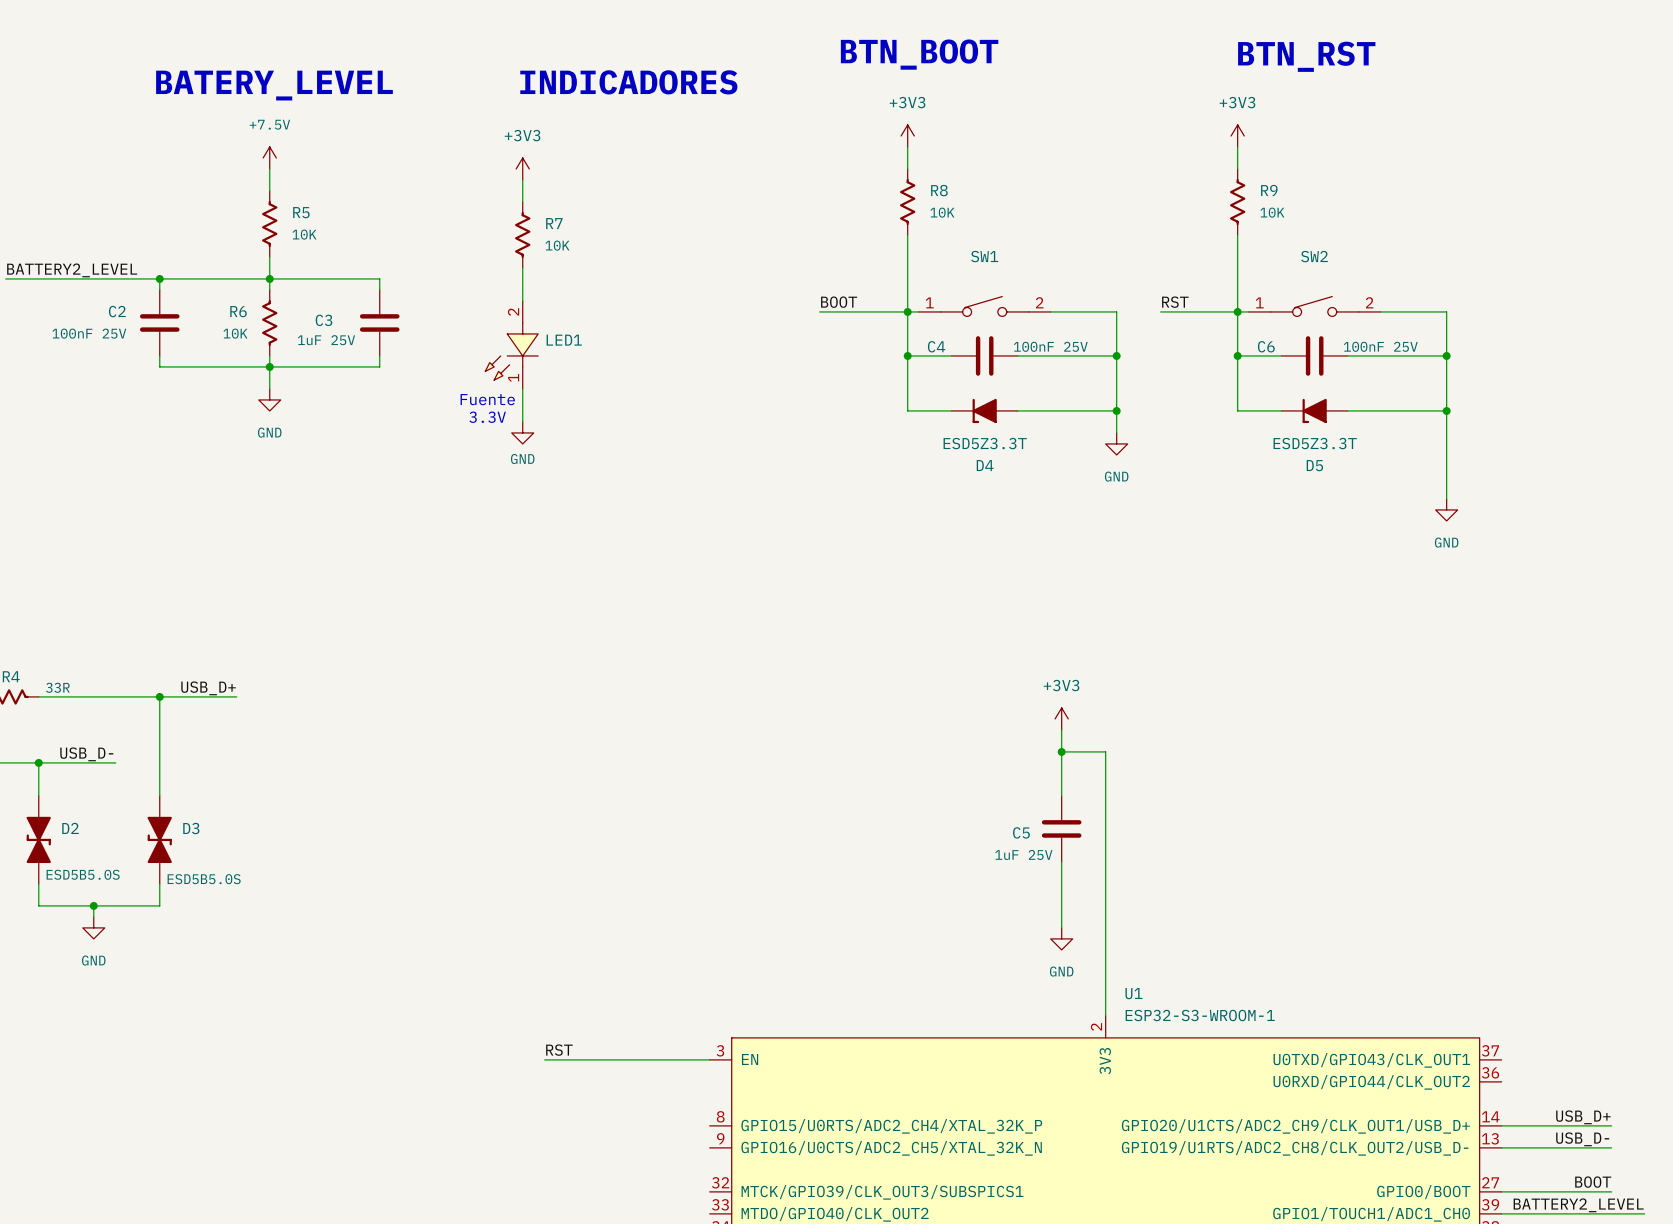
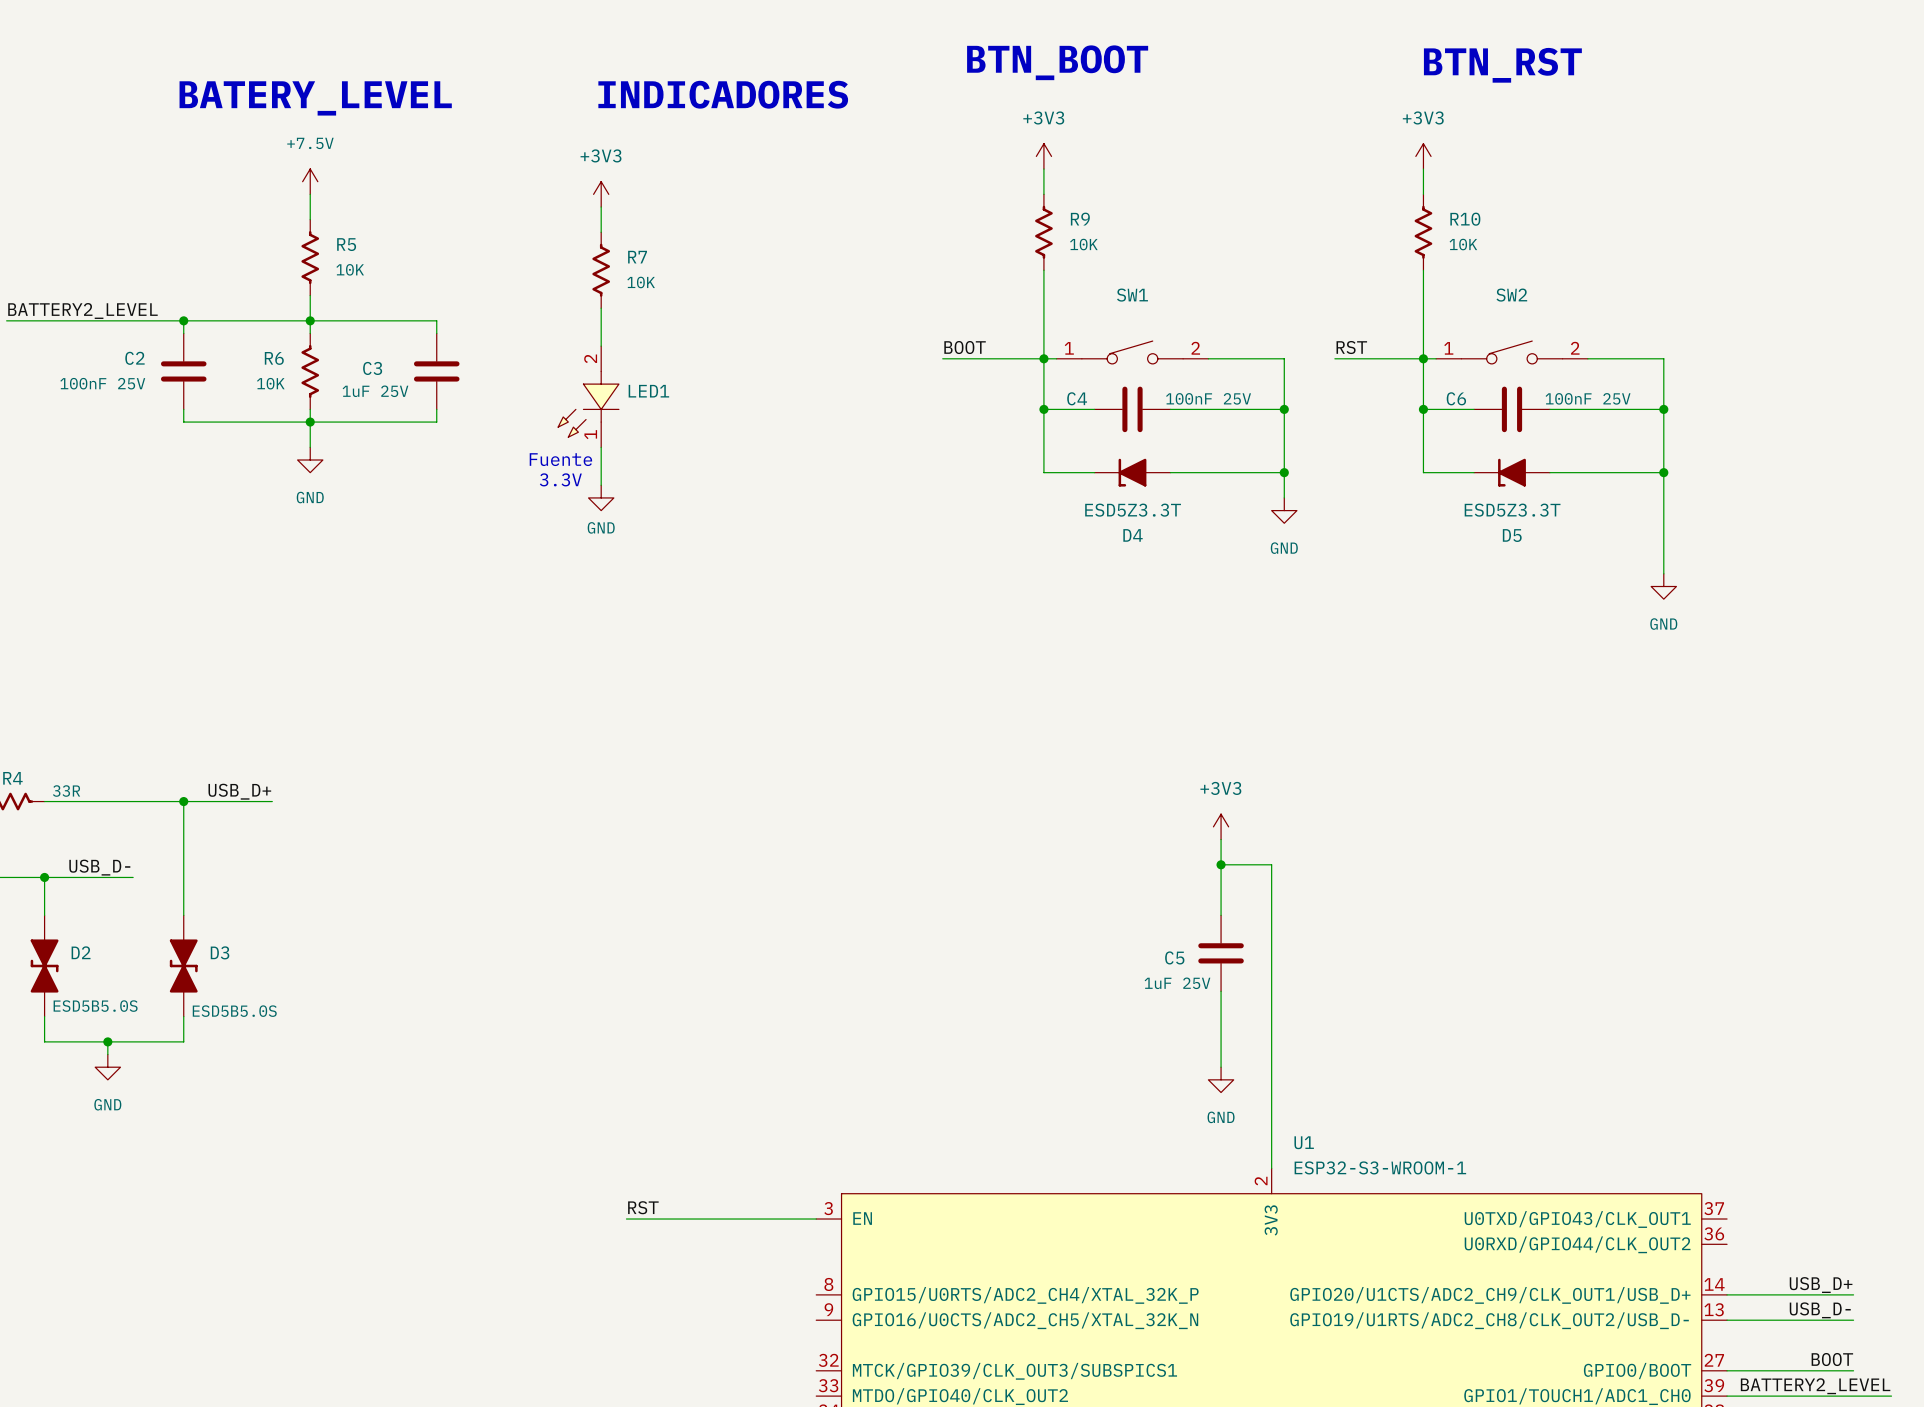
R8 name: R8 (939, 190) -> R9 (1080, 219)
R9 name: R9 (1269, 190) -> R10 (1465, 219)

